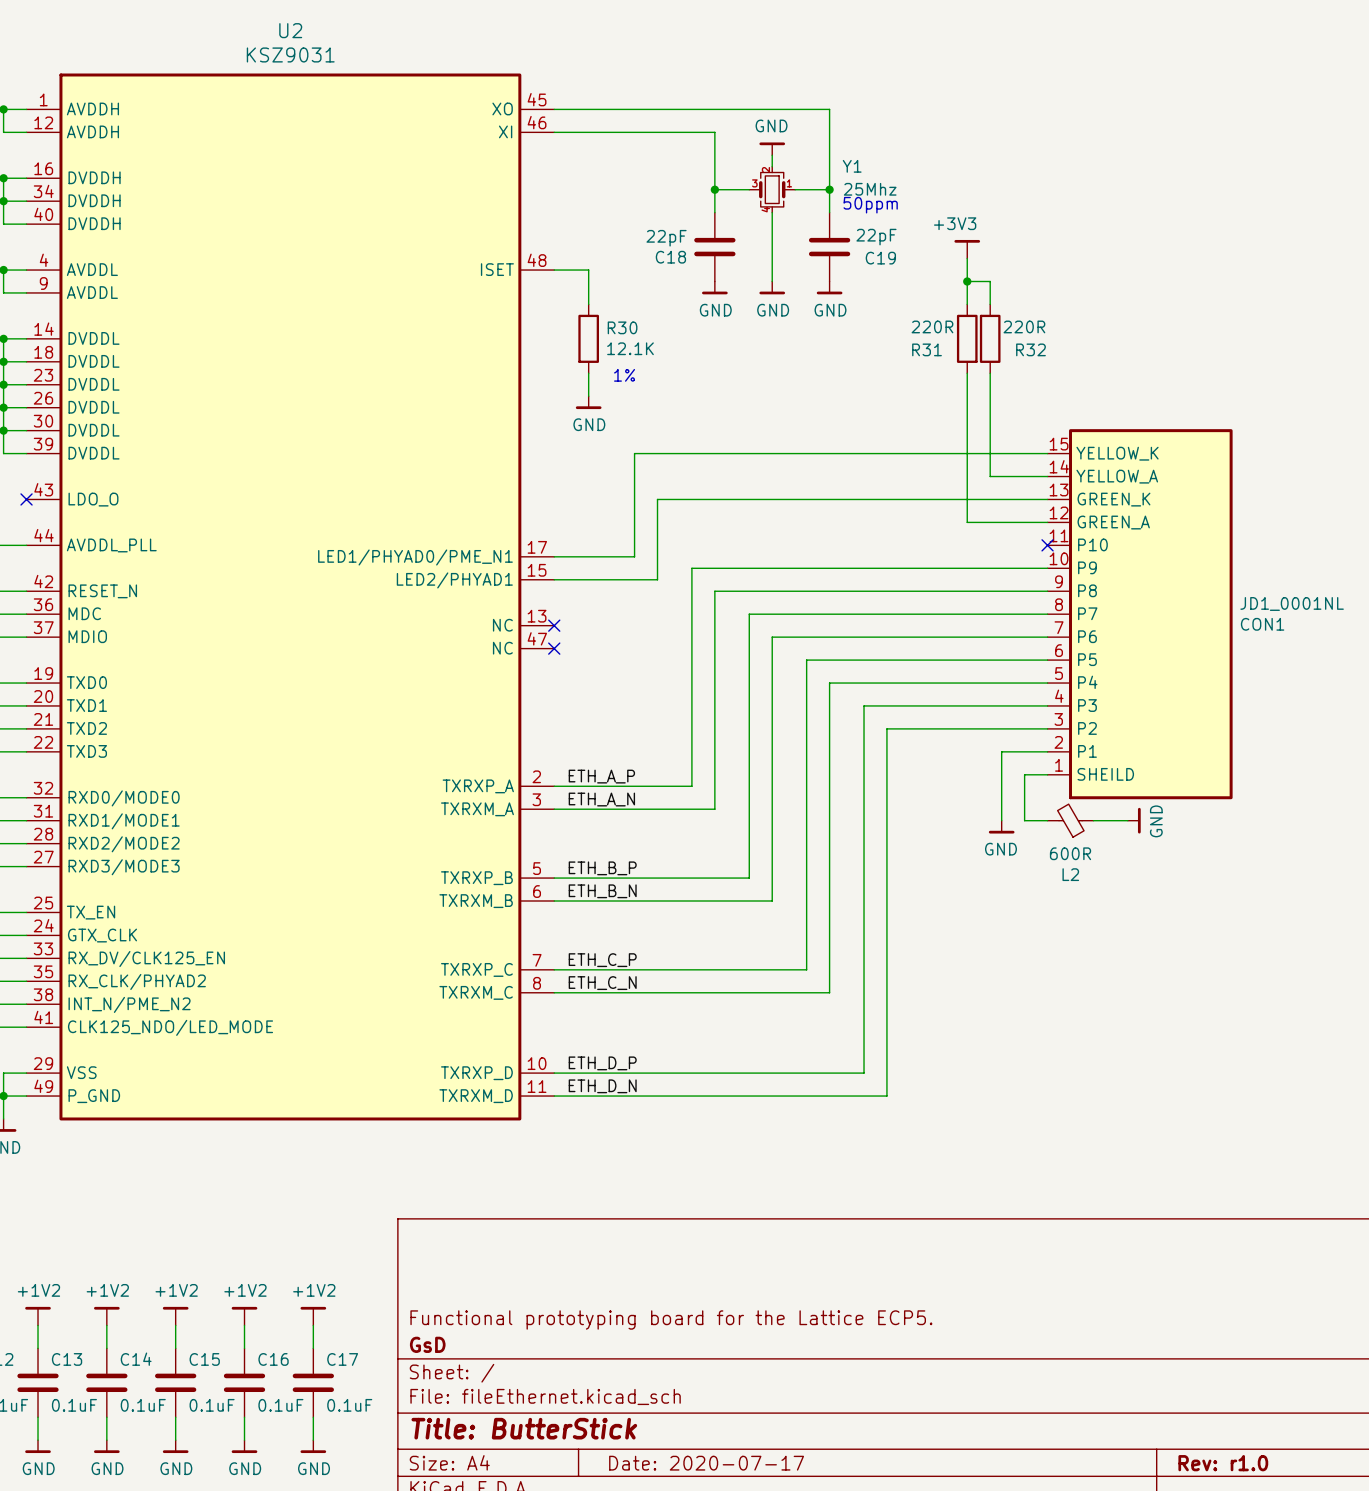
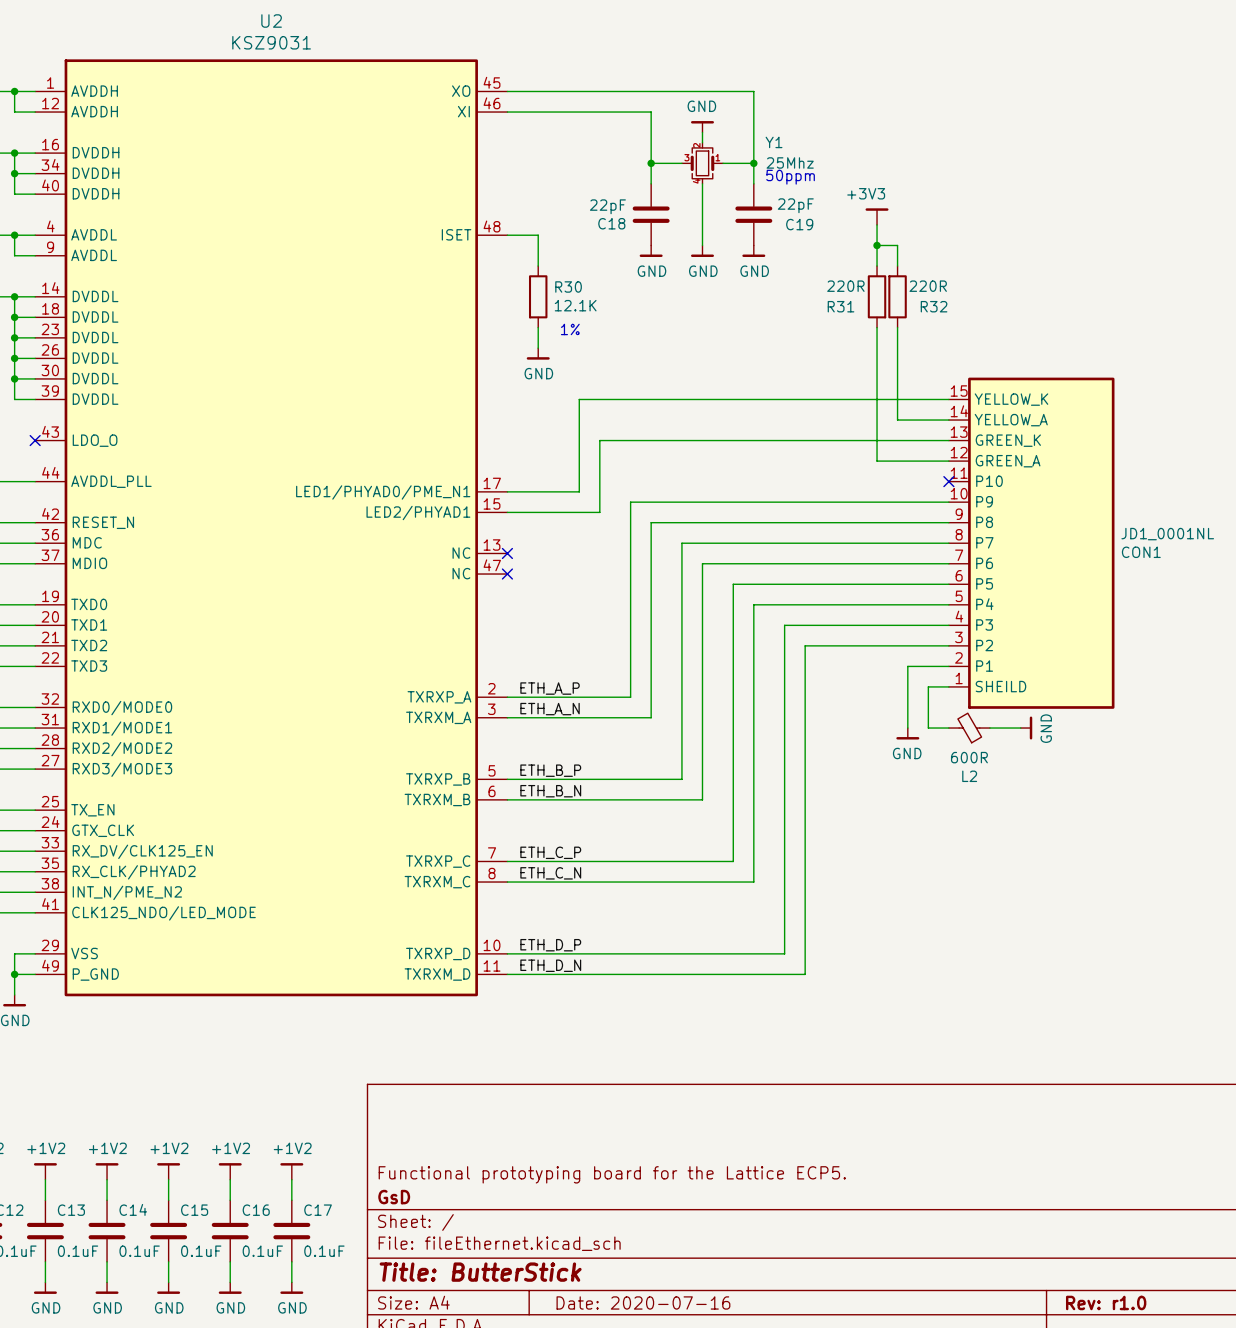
title block: Date: 2020-07-17 (706, 1463) -> Date: 2020-07-16 (643, 1302)

